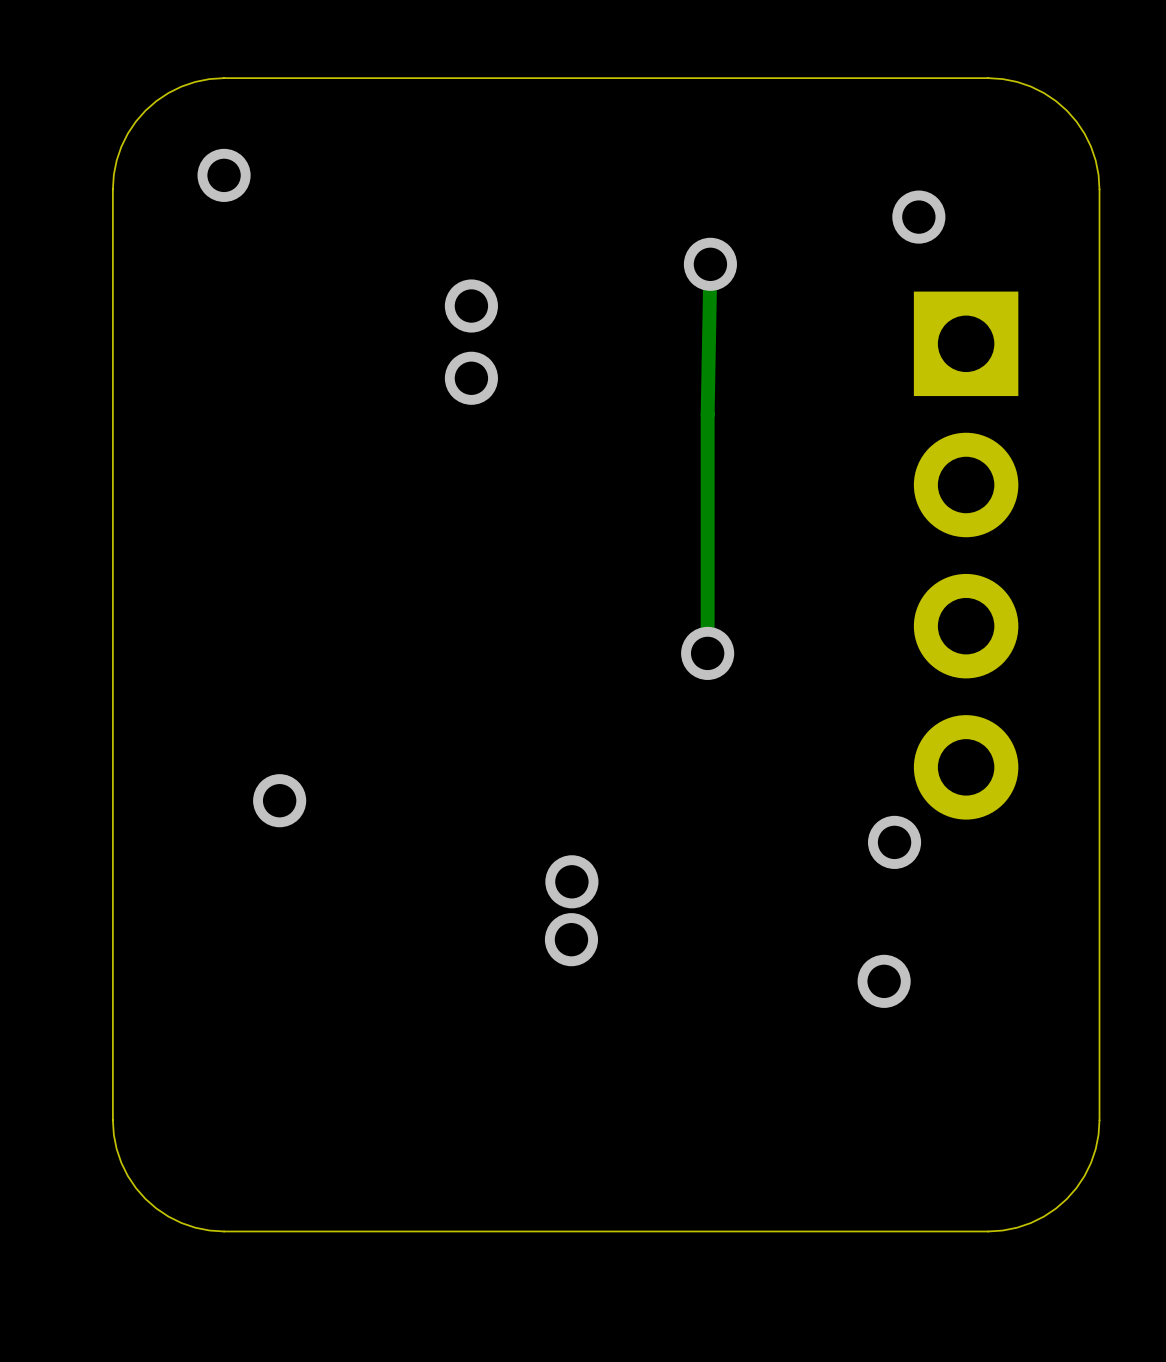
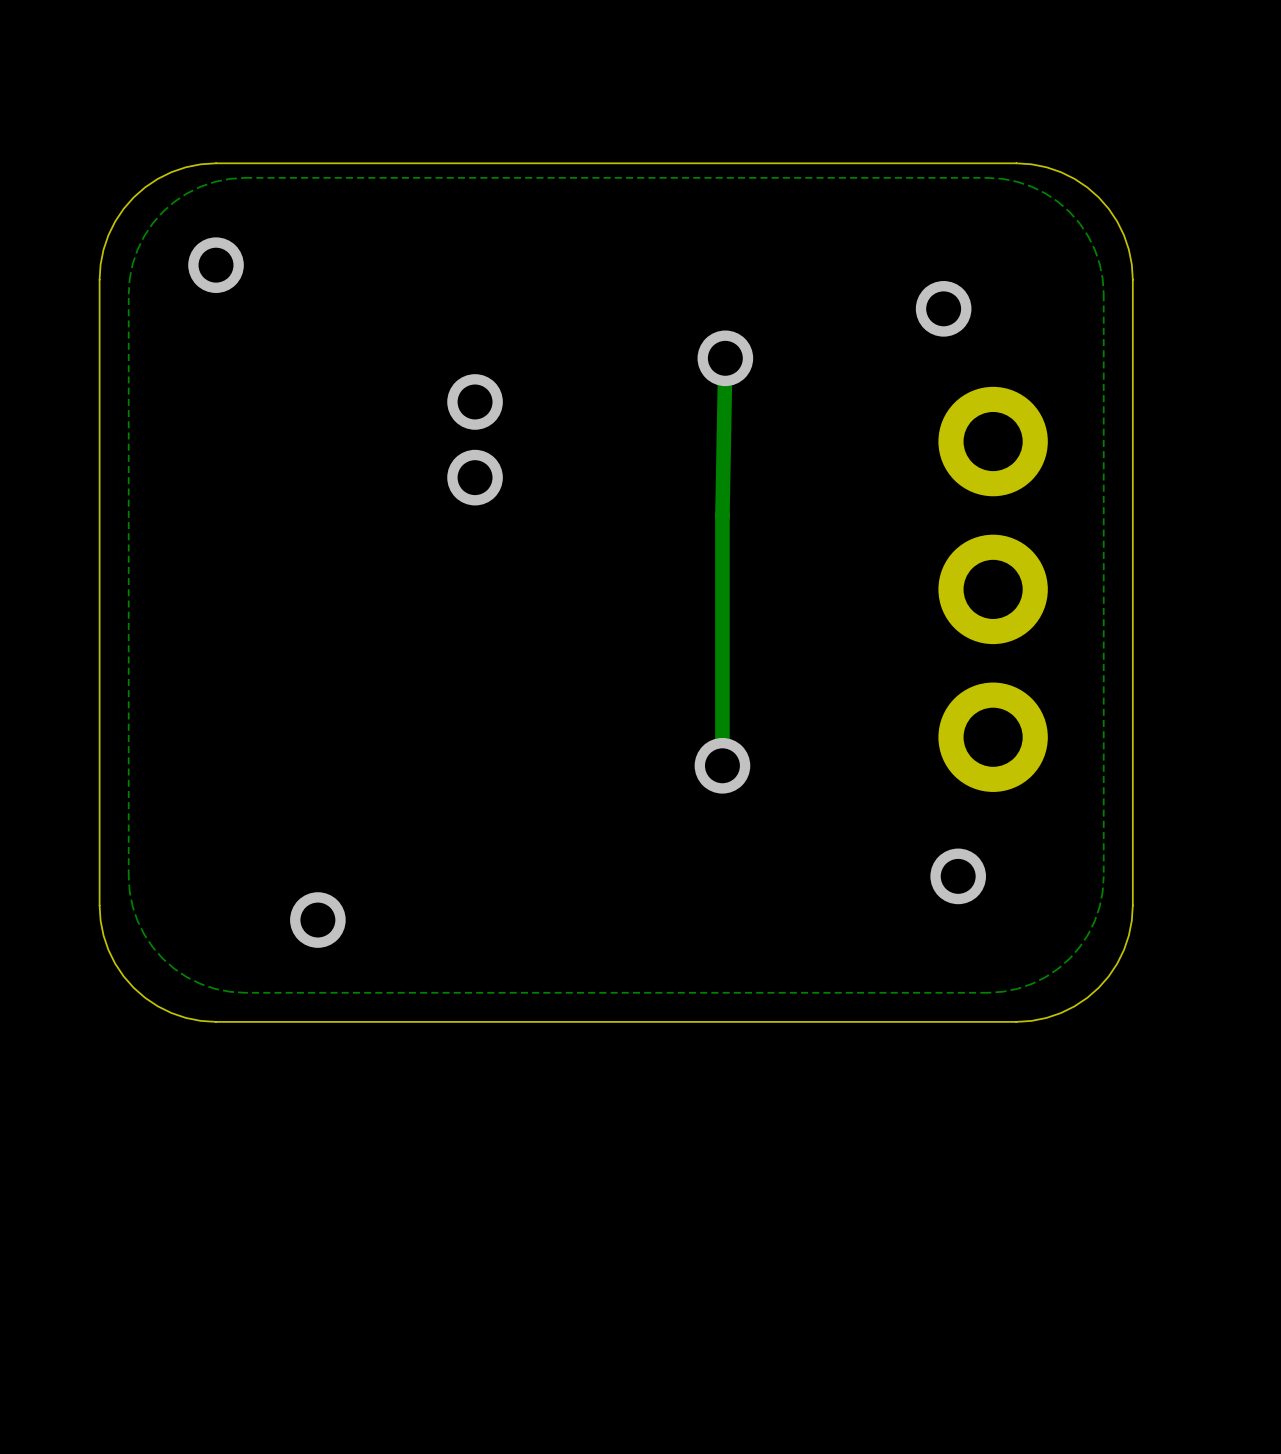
zone outline: none -> (987, 177) (245, 177) (229, 178) (200, 186) (186, 193) (162, 211) (144, 236) (137, 249) (129, 279) (128, 294) (128, 876) (129, 891) (137, 920) (144, 934) (162, 958) (174, 968) (200, 983) (229, 991) (245, 992) (987, 992) (1002, 991) (1031, 983) (1045, 977) (1069, 958) (1088, 934) (1094, 920) (1099, 906) (1103, 876) (1102, 279) (1094, 249) (1079, 223) (1069, 211) (1045, 193) (1031, 186) (1002, 178) (987, 177)
part: none -> (993, 589)
part: (966, 555) -> none
board edge: (1099, 786) (1099, 1120) (1095, 1149) (1084, 1175) (1066, 1198) (1056, 1208) (1030, 1223) (1017, 1227) (988, 1231) (224, 1231) (195, 1227) (168, 1216) (145, 1198) (127, 1175) (121, 1162) (113, 1134) (112, 786) -> (1132, 905) (1128, 935) (1123, 950) (1117, 963) (1098, 987) (1074, 1006) (1060, 1013) (1046, 1017) (1016, 1021) (200, 1020) (171, 1013) (157, 1006) (133, 987) (123, 976) (108, 950) (103, 935) (99, 905)
via position: (279, 800) -> (317, 920)
via position: (894, 842) -> (958, 876)
via: (571, 881) -> none
via: (571, 939) -> none
via: (884, 981) -> none

